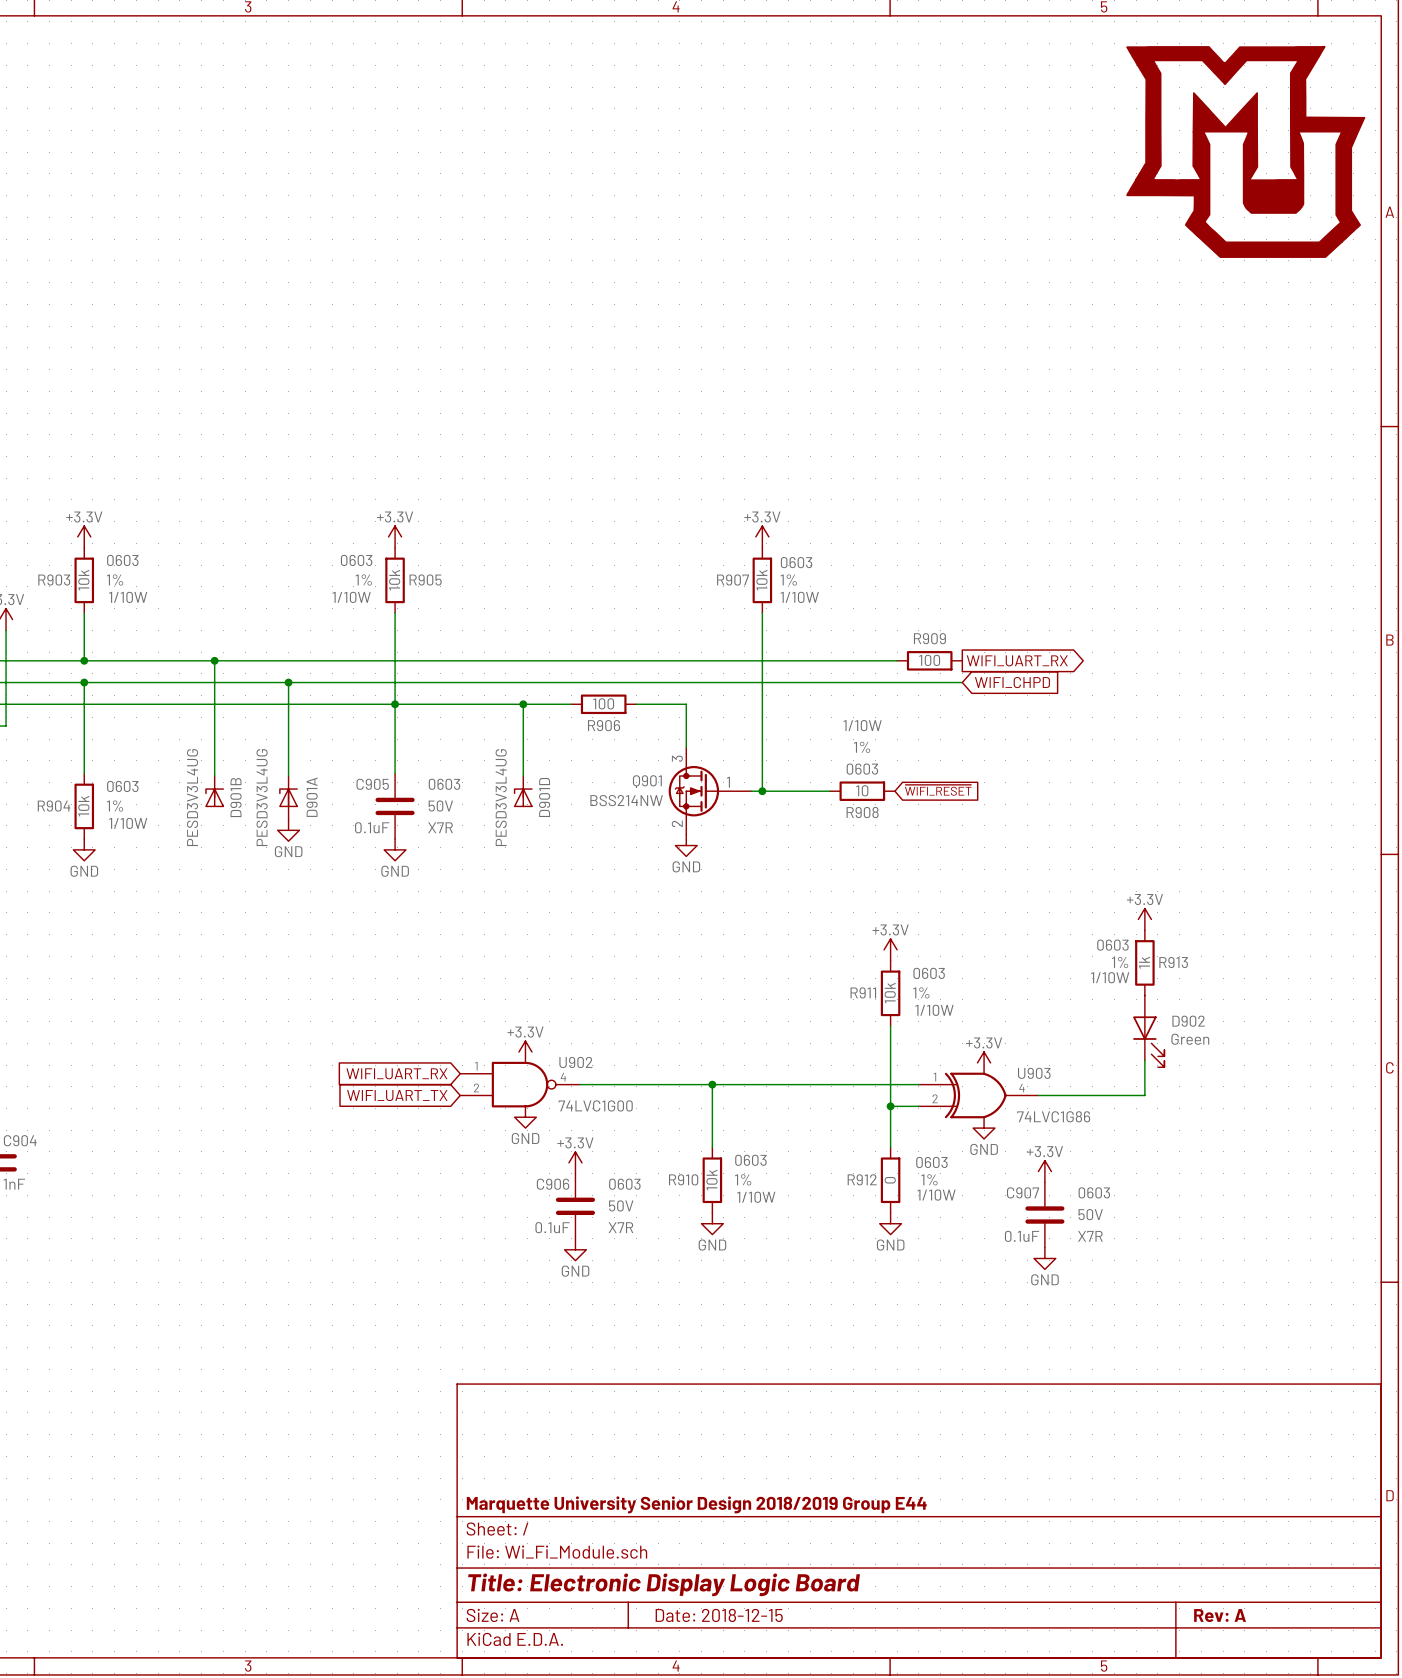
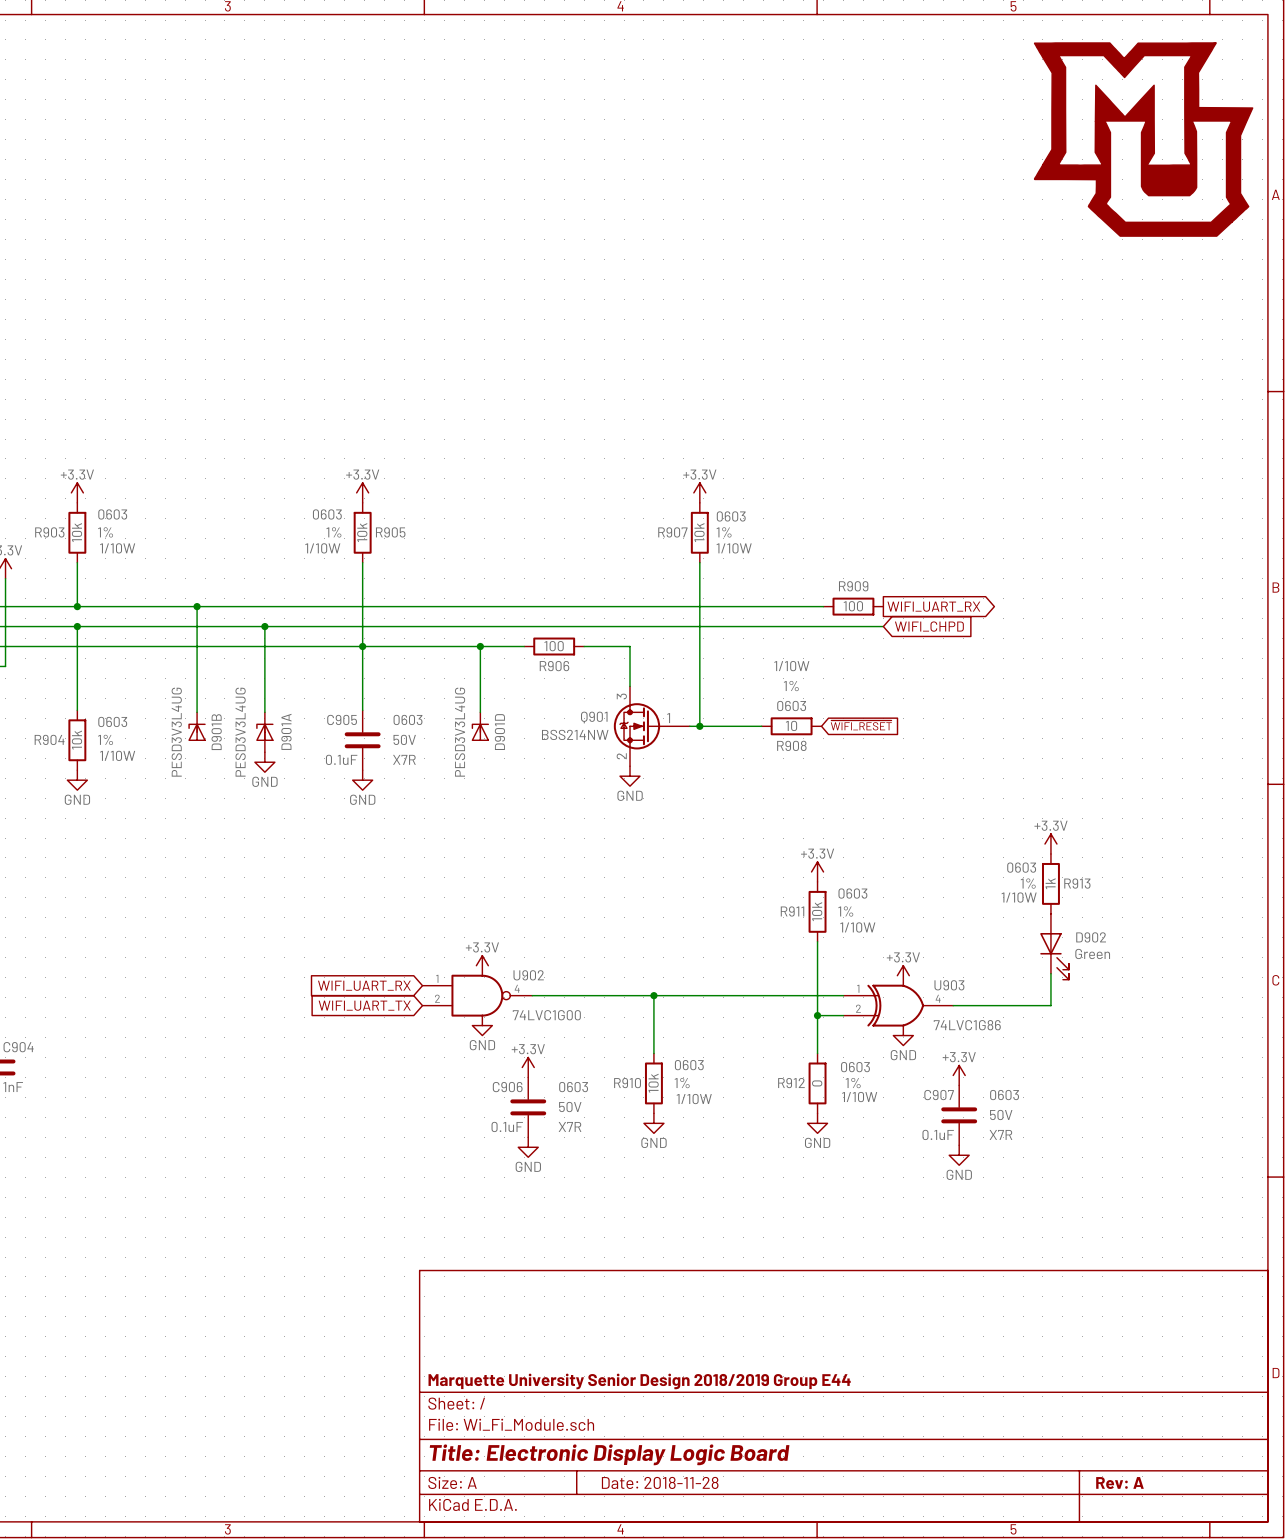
title block: Date: 2018-12-15 (719, 1615) -> Date: 2018-11-28 (660, 1482)

